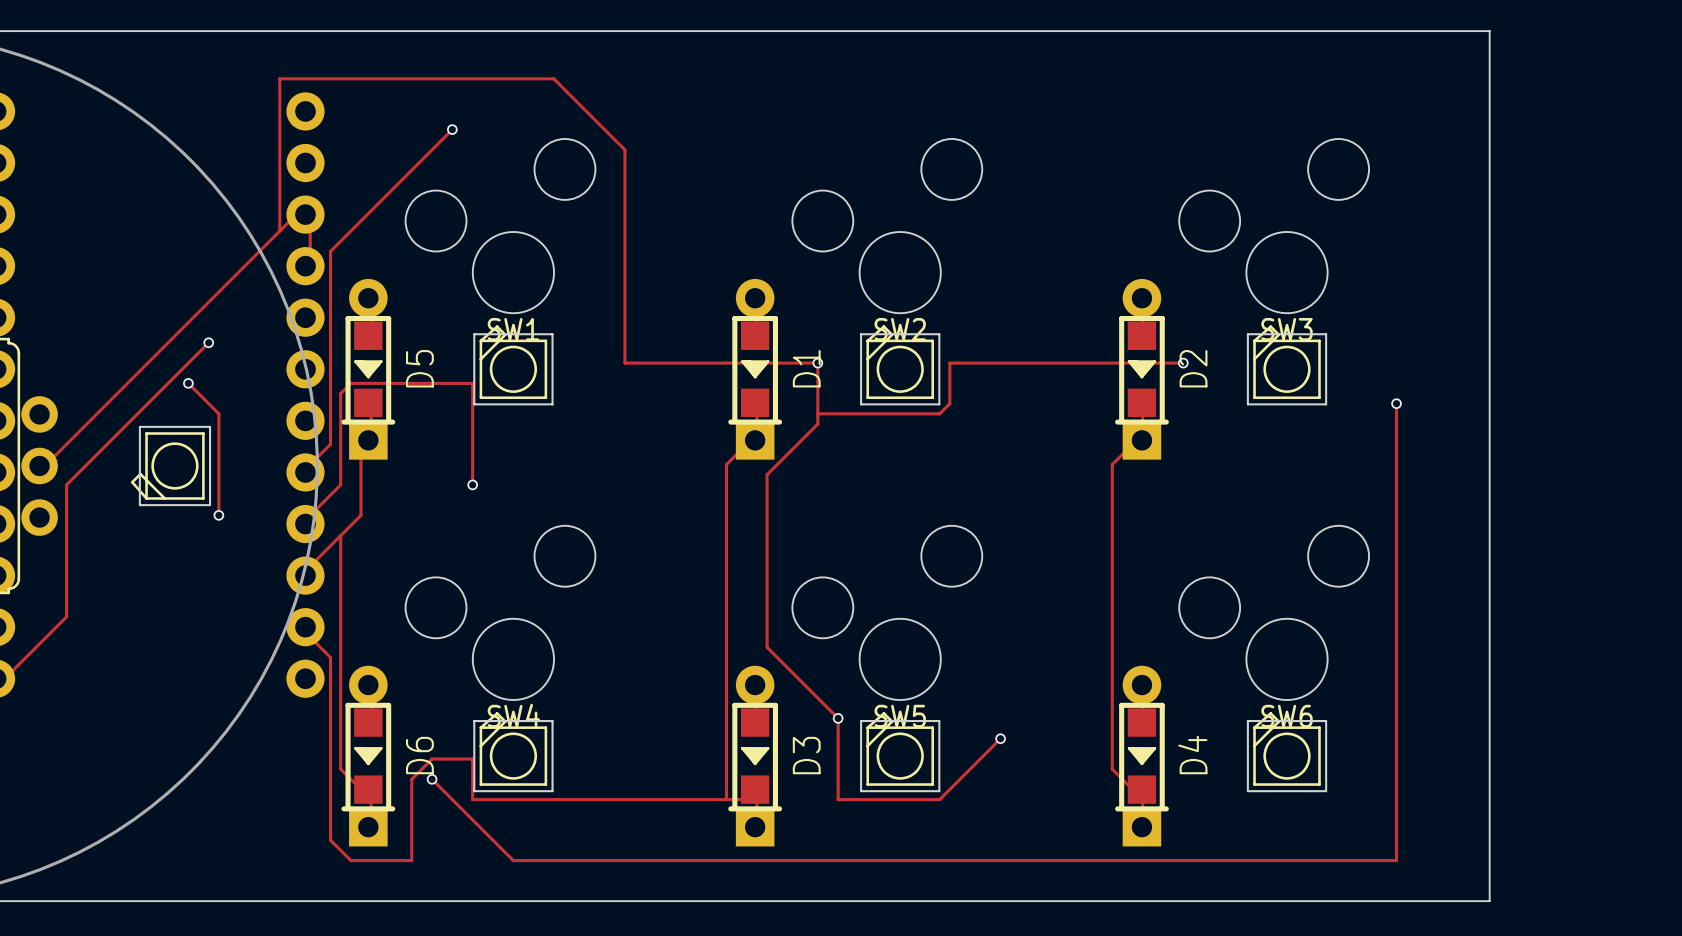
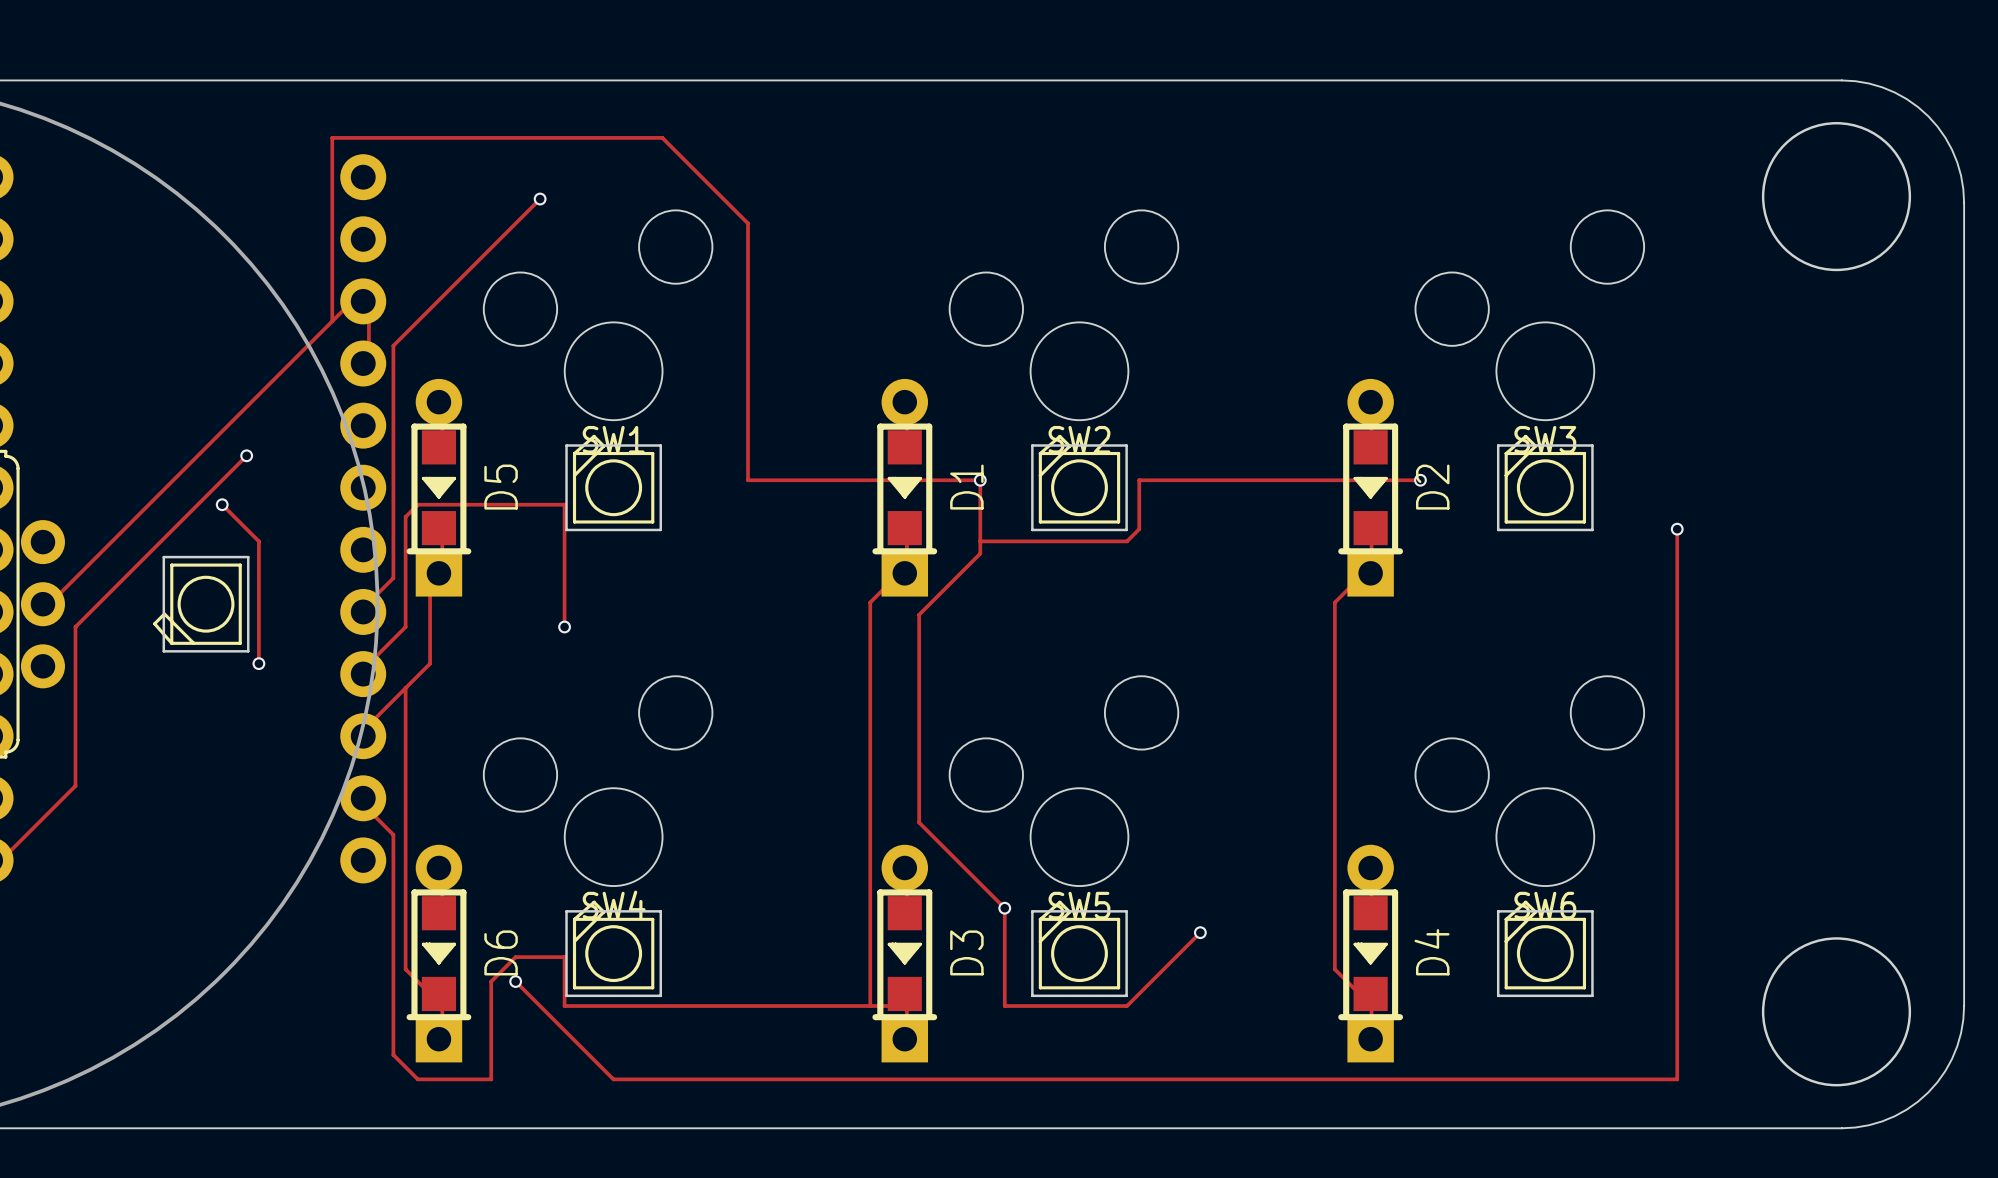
board edge: (1489, 31) (1489, 901) -> (1789, 80) (1855, 81) (1882, 87) (1906, 99) (1928, 116) (1945, 137) (1957, 162) (1961, 175) (1964, 202) (1964, 1006) (1961, 1033) (1957, 1046) (1945, 1071) (1928, 1092) (1906, 1109) (1882, 1121) (1855, 1127) (1789, 1128)
round board edge: none -> [1761, 122, 1912, 272]
round board edge: none -> [1761, 937, 1912, 1087]

